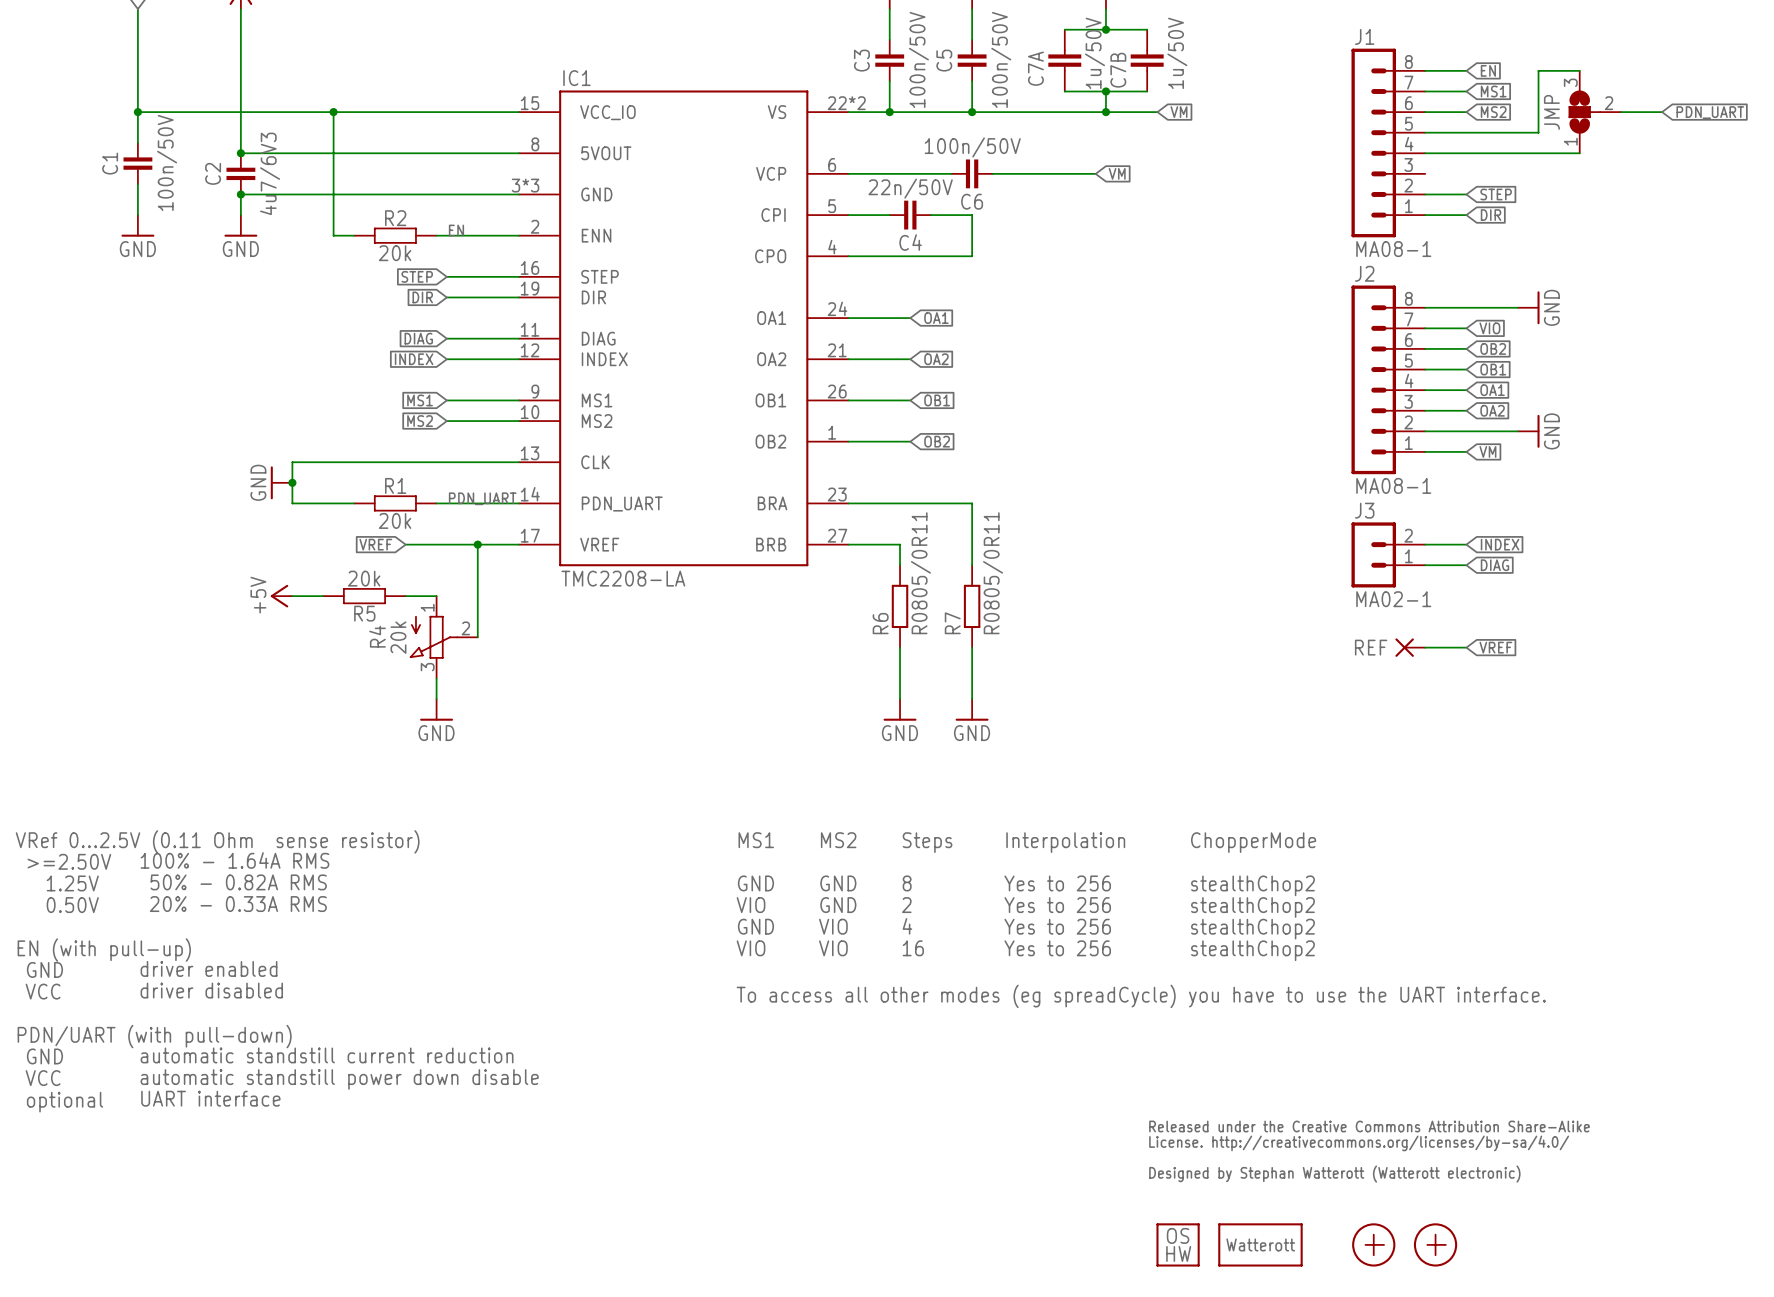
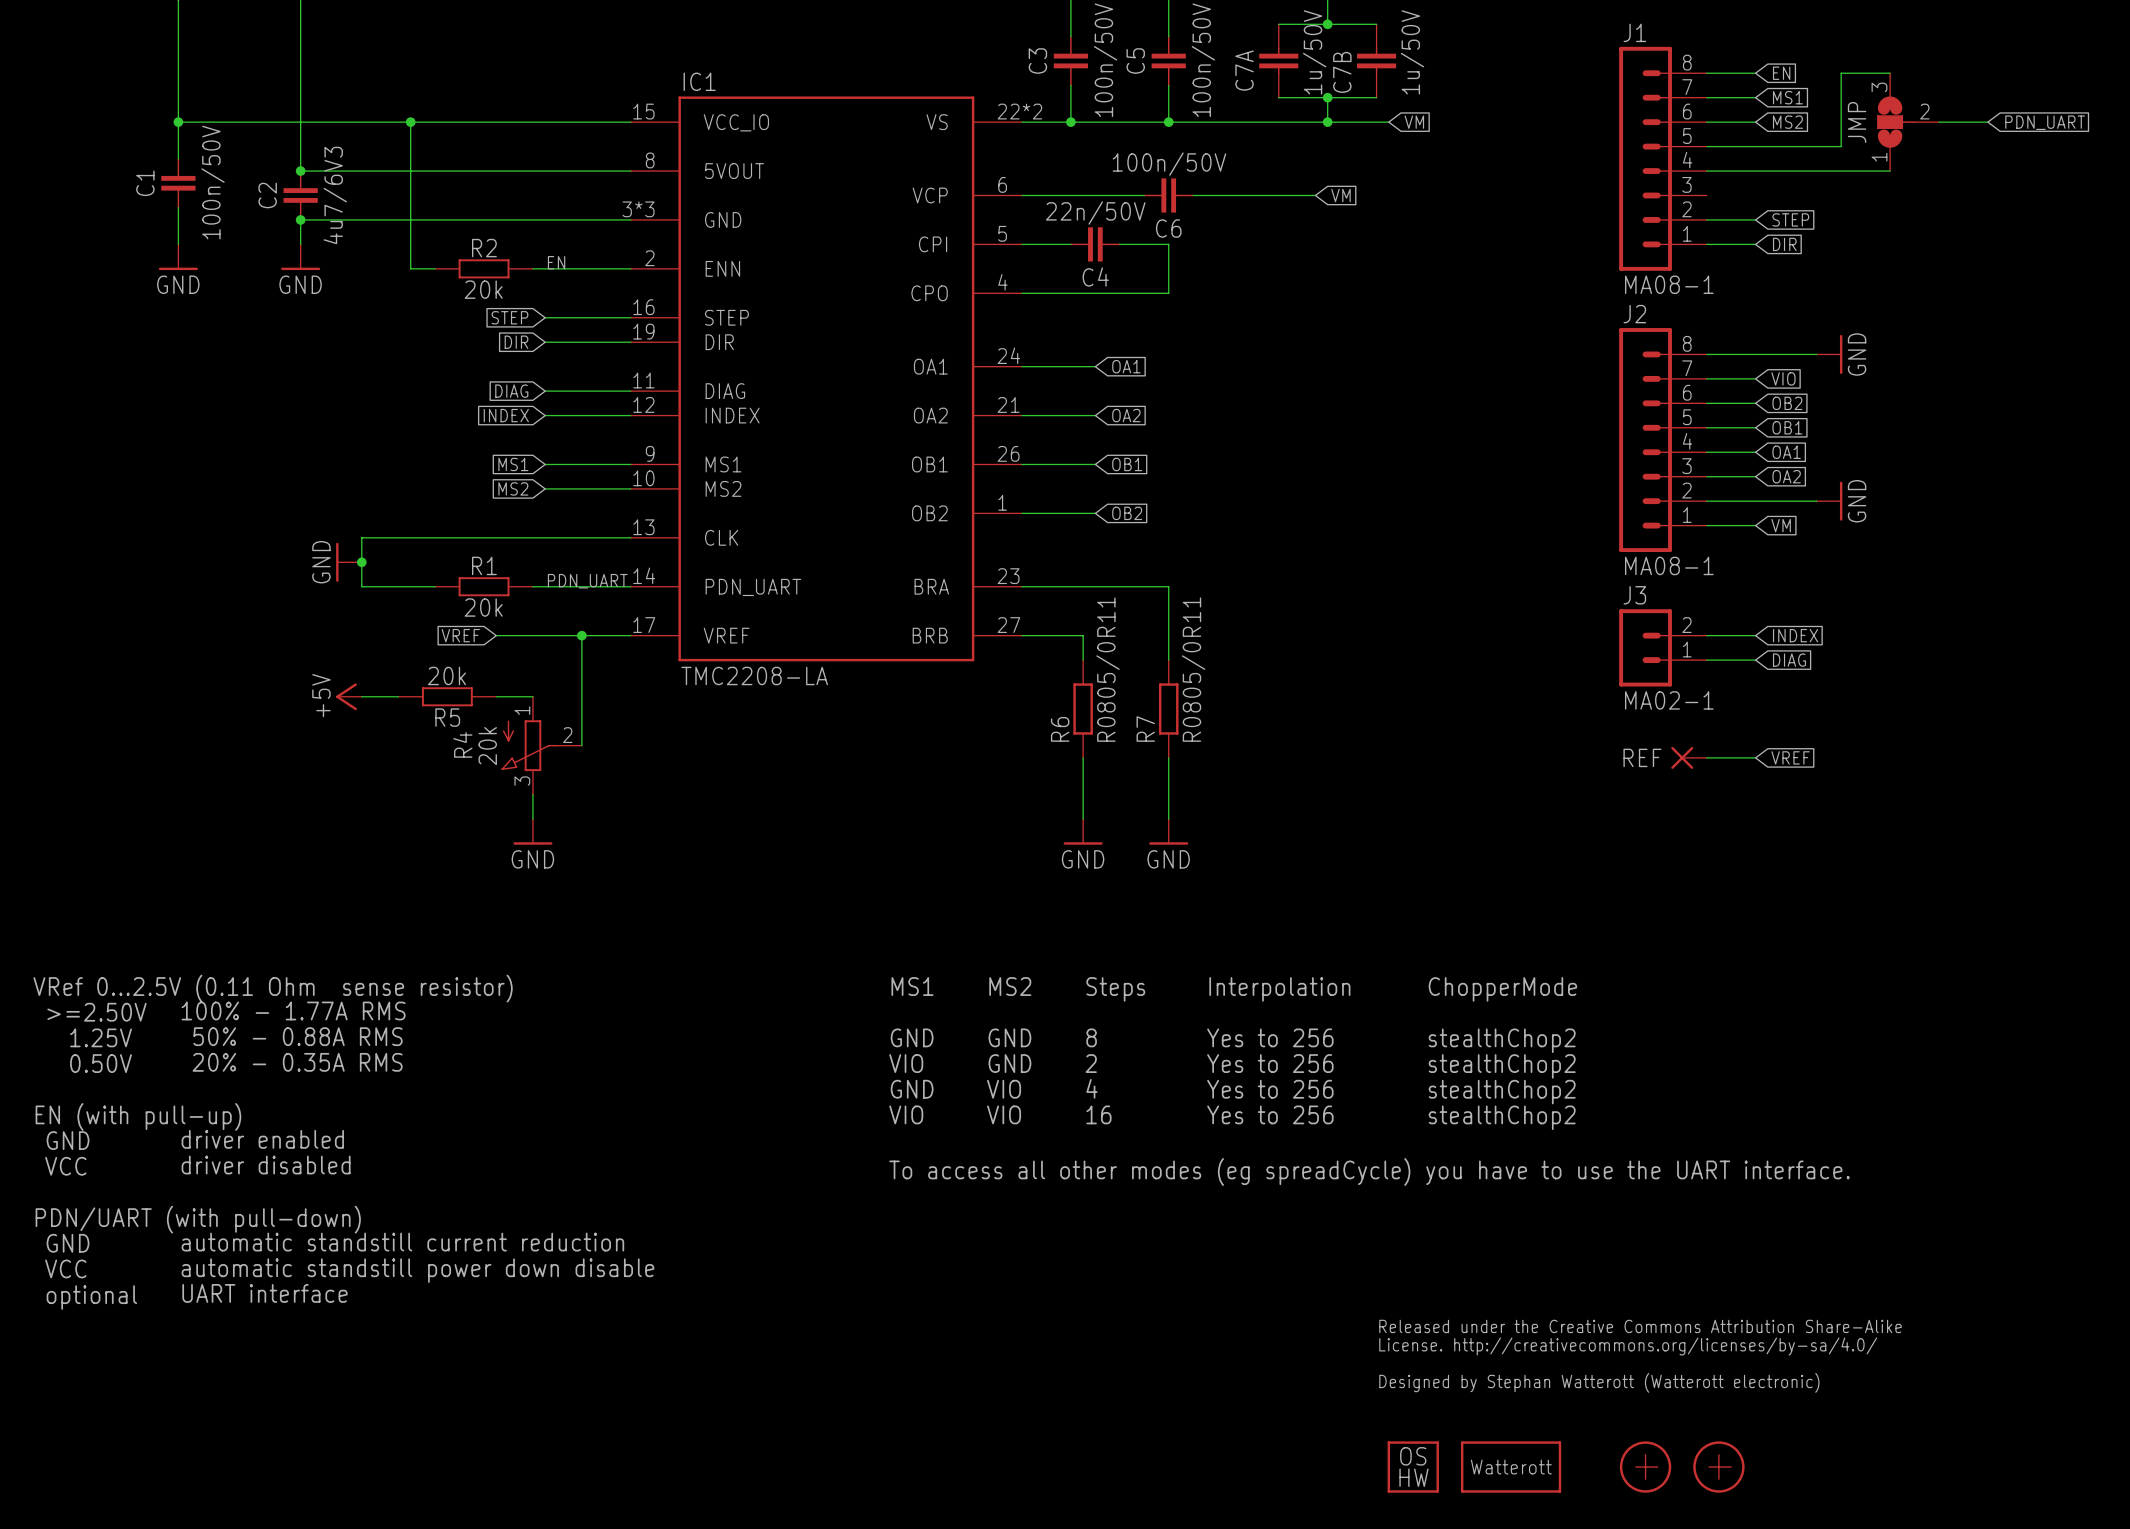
text: 100% - 1.64A RMS (234, 860) -> 100% - 1.77A RMS (293, 1010)
text: 50% - 0.82A RMS (238, 882) -> 50% - 0.88A RMS (297, 1036)
text: 20% - 0.33A RMS (238, 904) -> 20% - 0.35A RMS (297, 1062)

